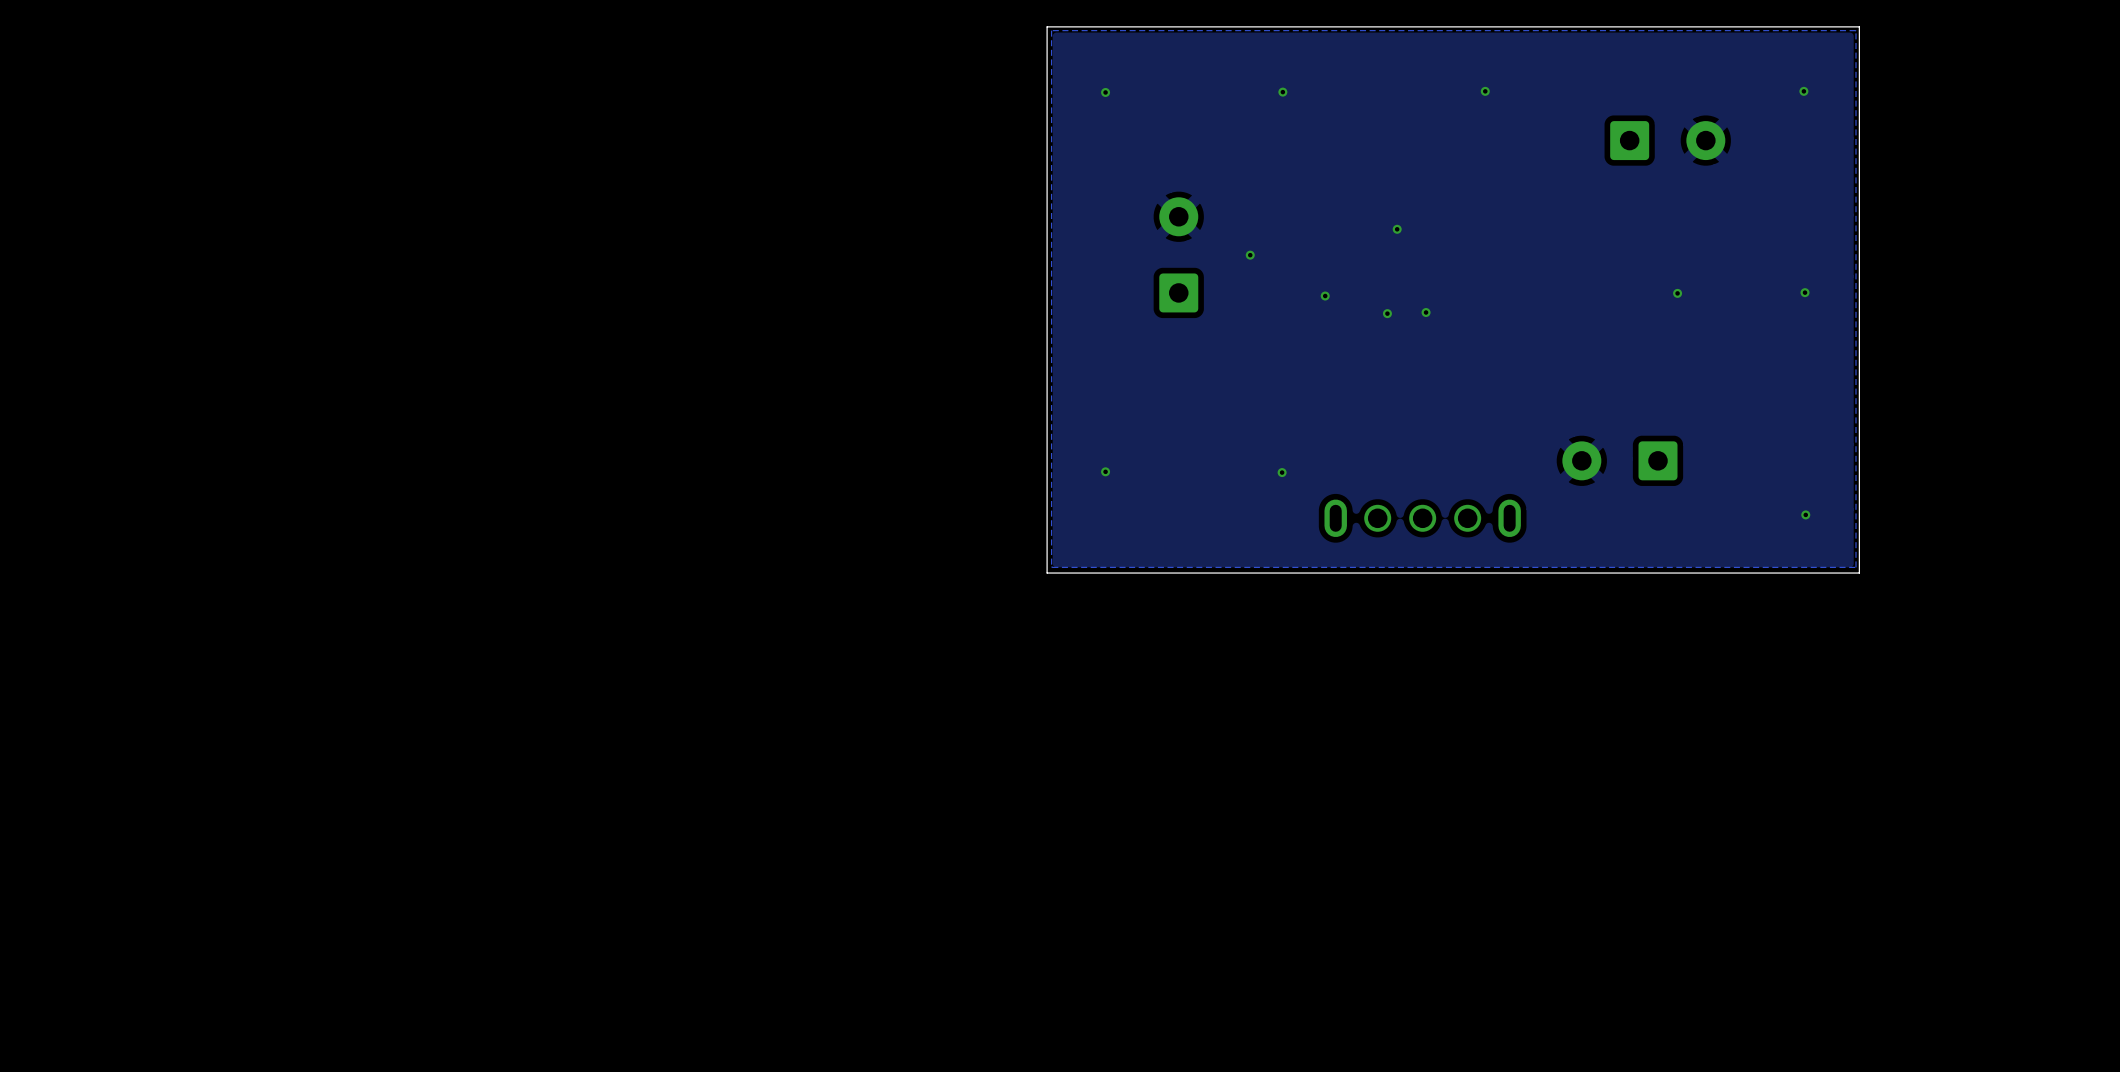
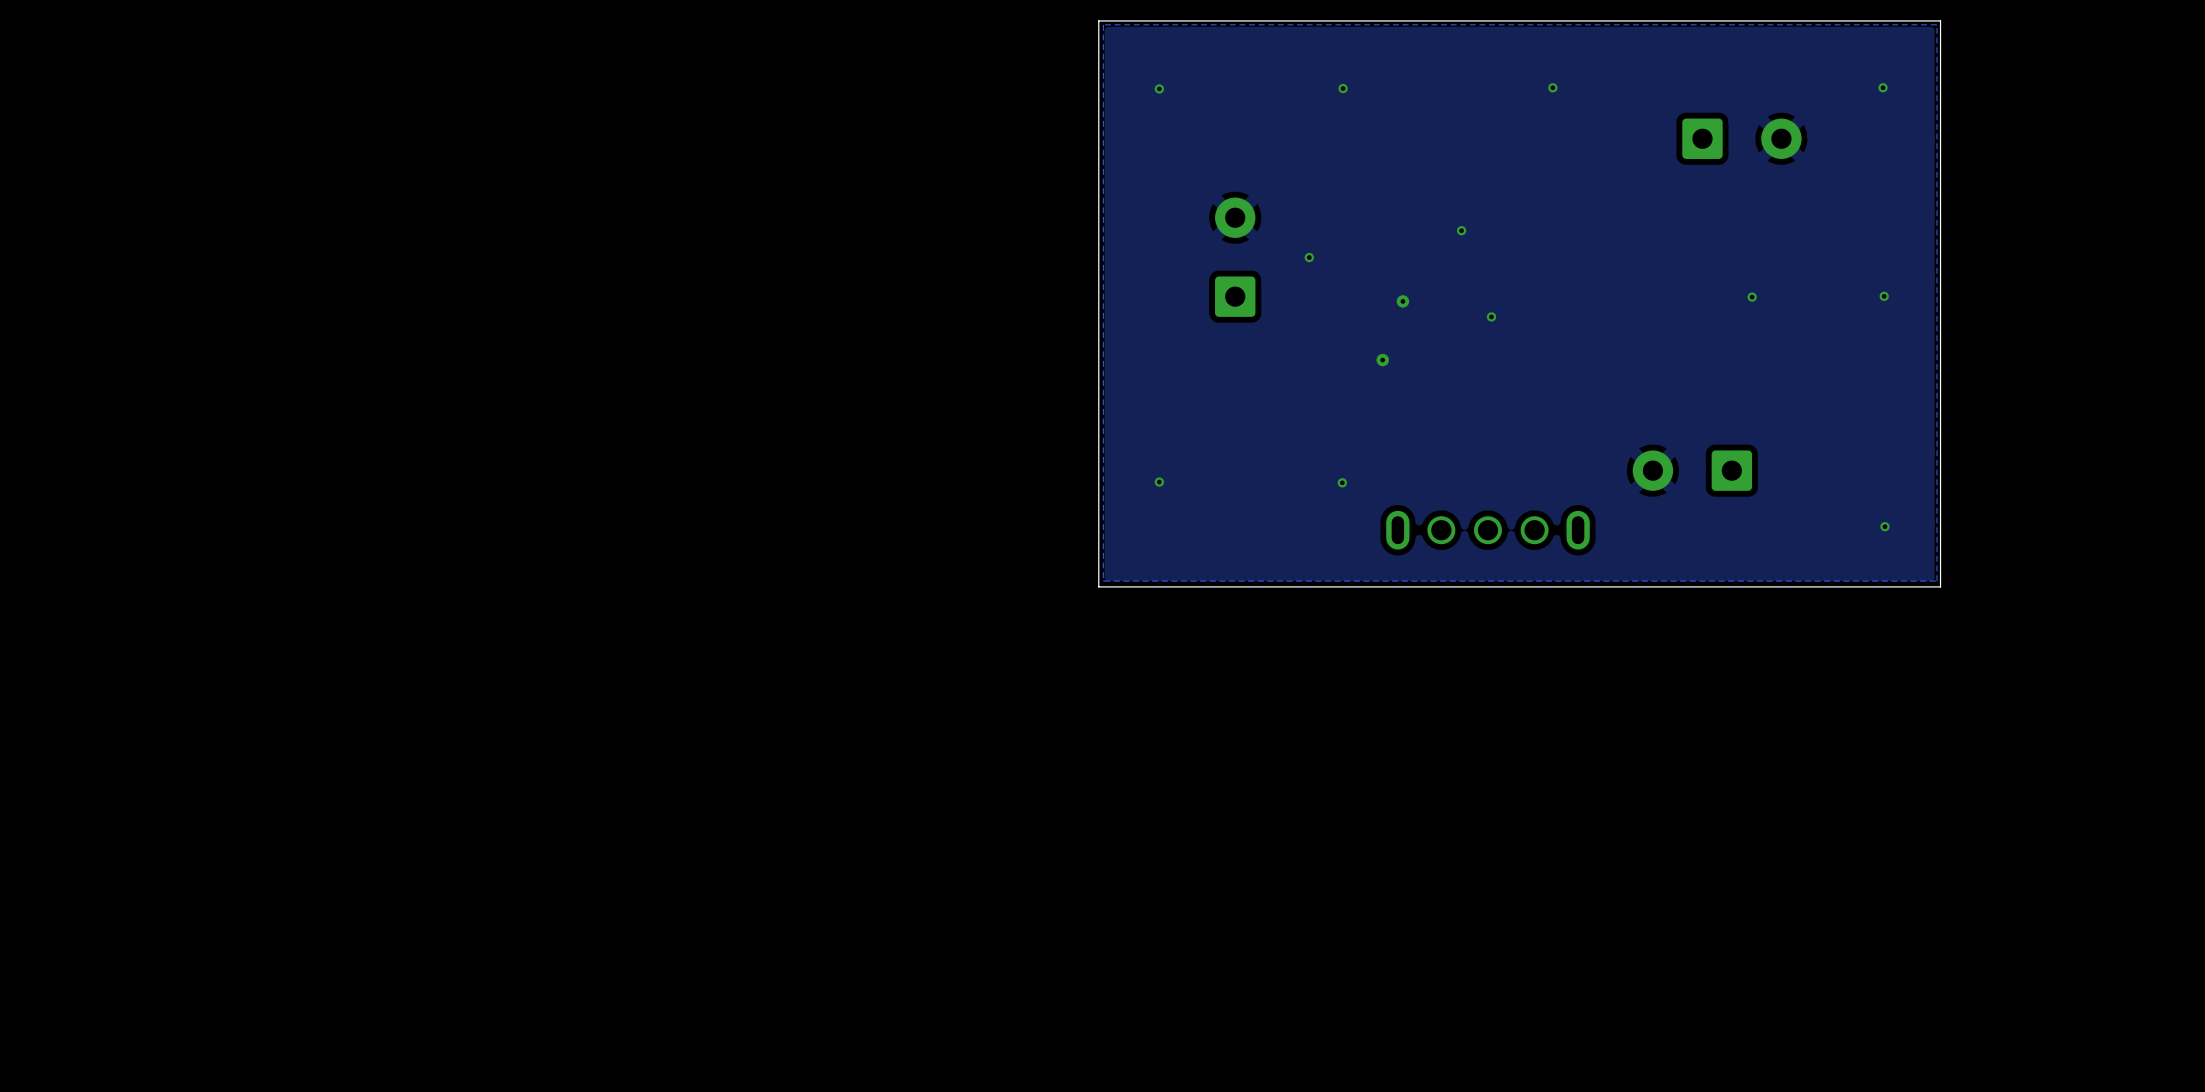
via: (1325, 296) -> none
via: none -> (1402, 301)
via: (1387, 313) -> none
via: none -> (1382, 360)

